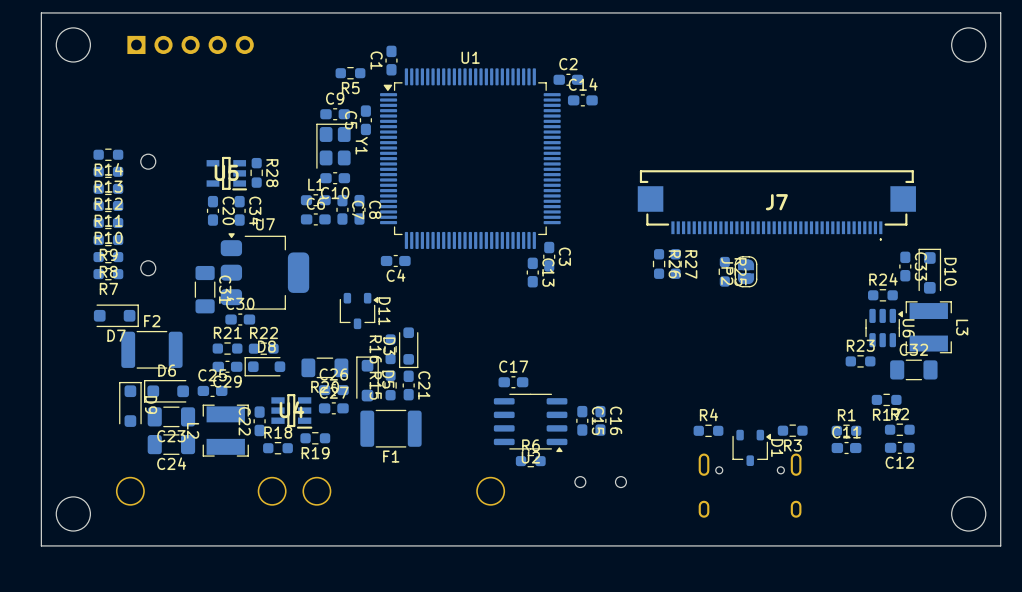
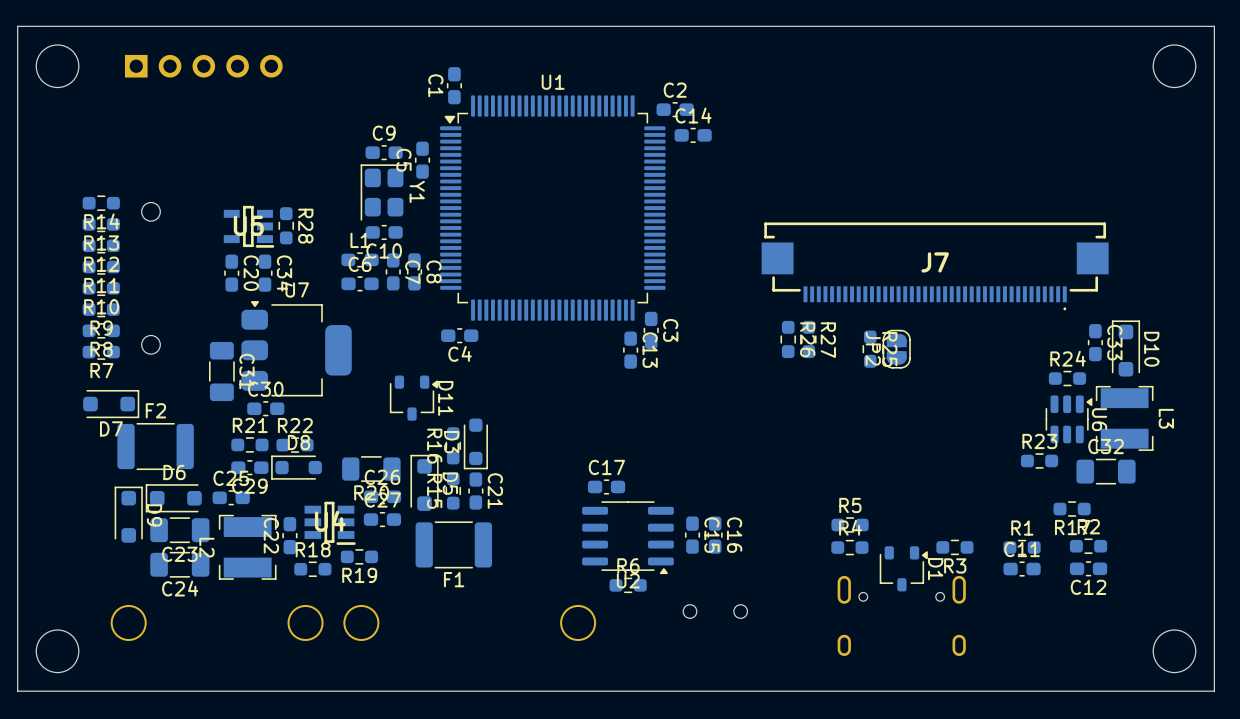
R5 position: (350, 73) -> (850, 524)
R5 name position: R5 (350, 88) -> R5 (850, 505)

